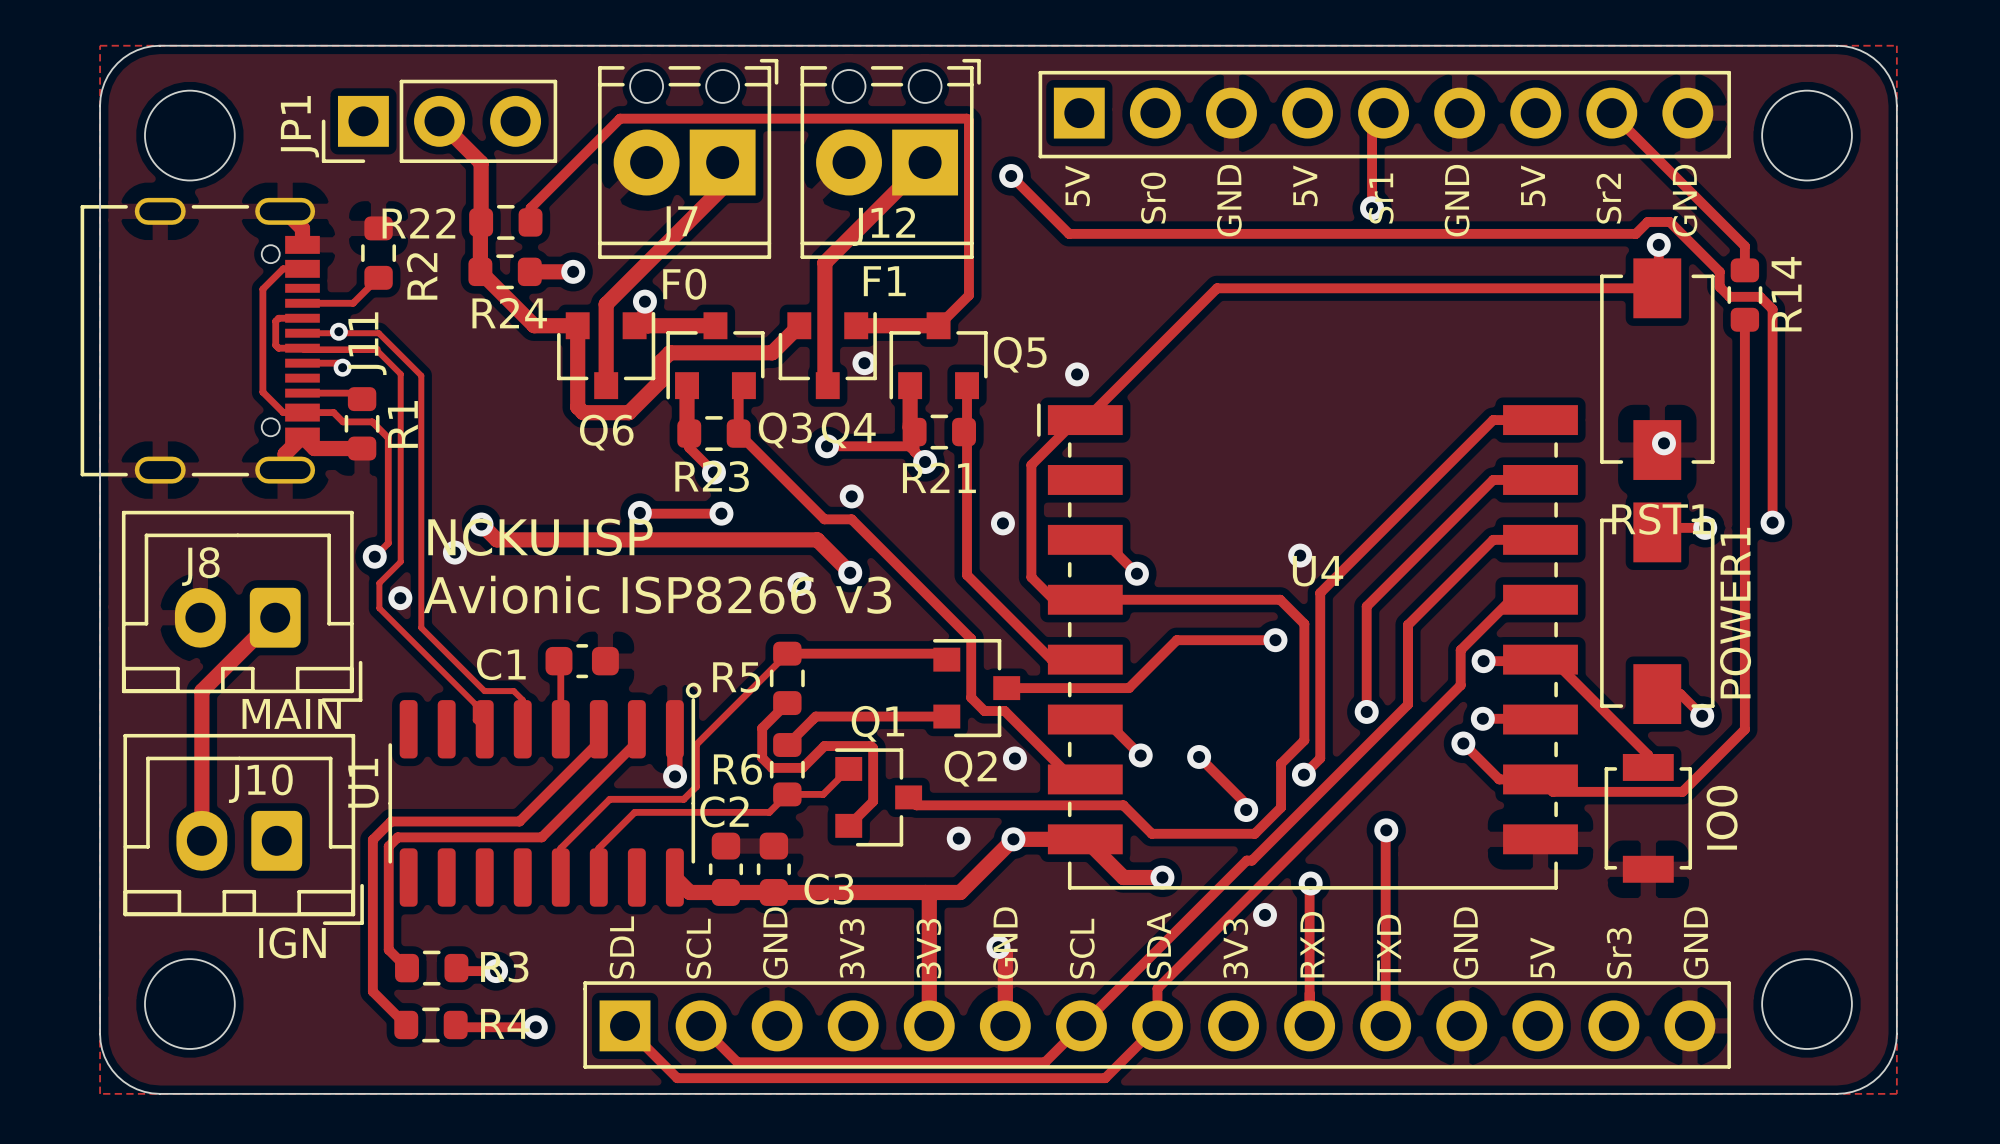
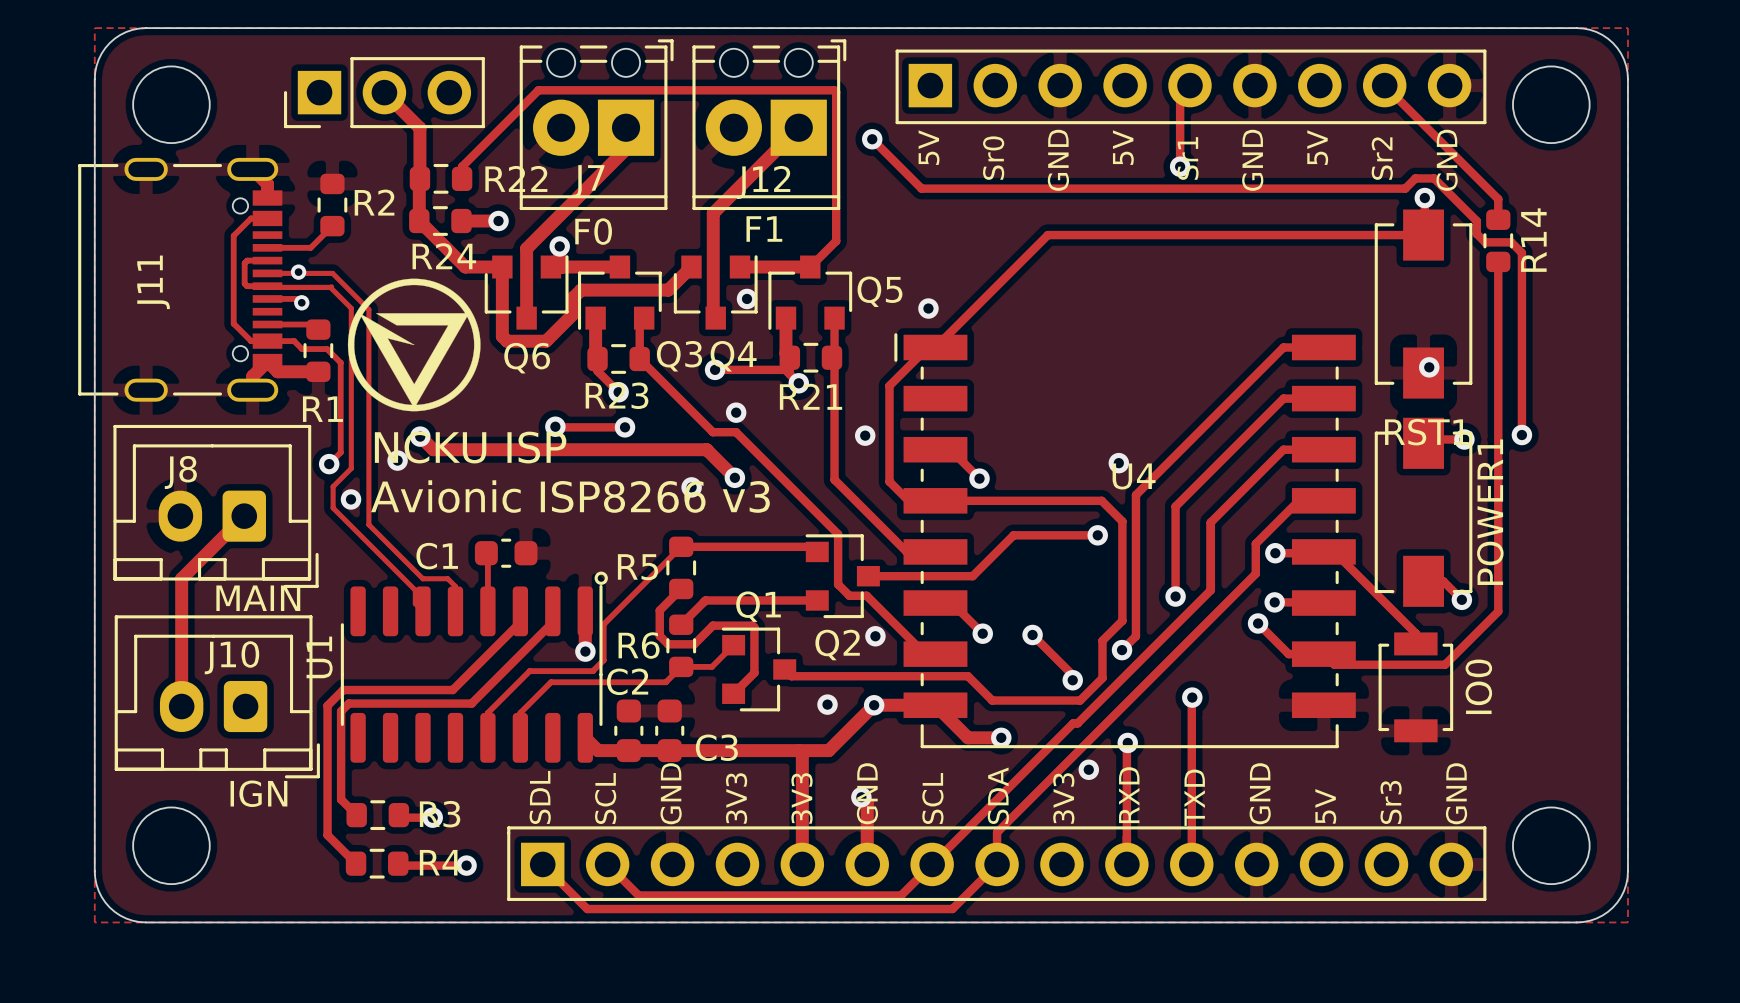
JP1 name: JP1 (299, 126) -> none
R22 name position: R22 (418, 223) -> R22 (516, 178)
R2 name rotation: 0° (422, 276) -> 90° clockwise (374, 202)
drawing: none -> [347, 278, 481, 412]
J11 name position: J11 (367, 343) -> J11 (153, 282)
R1 name rotation: 0° (402, 424) -> 90° clockwise (322, 409)
R1 name position: R1 (402, 424) -> R1 (322, 409)

